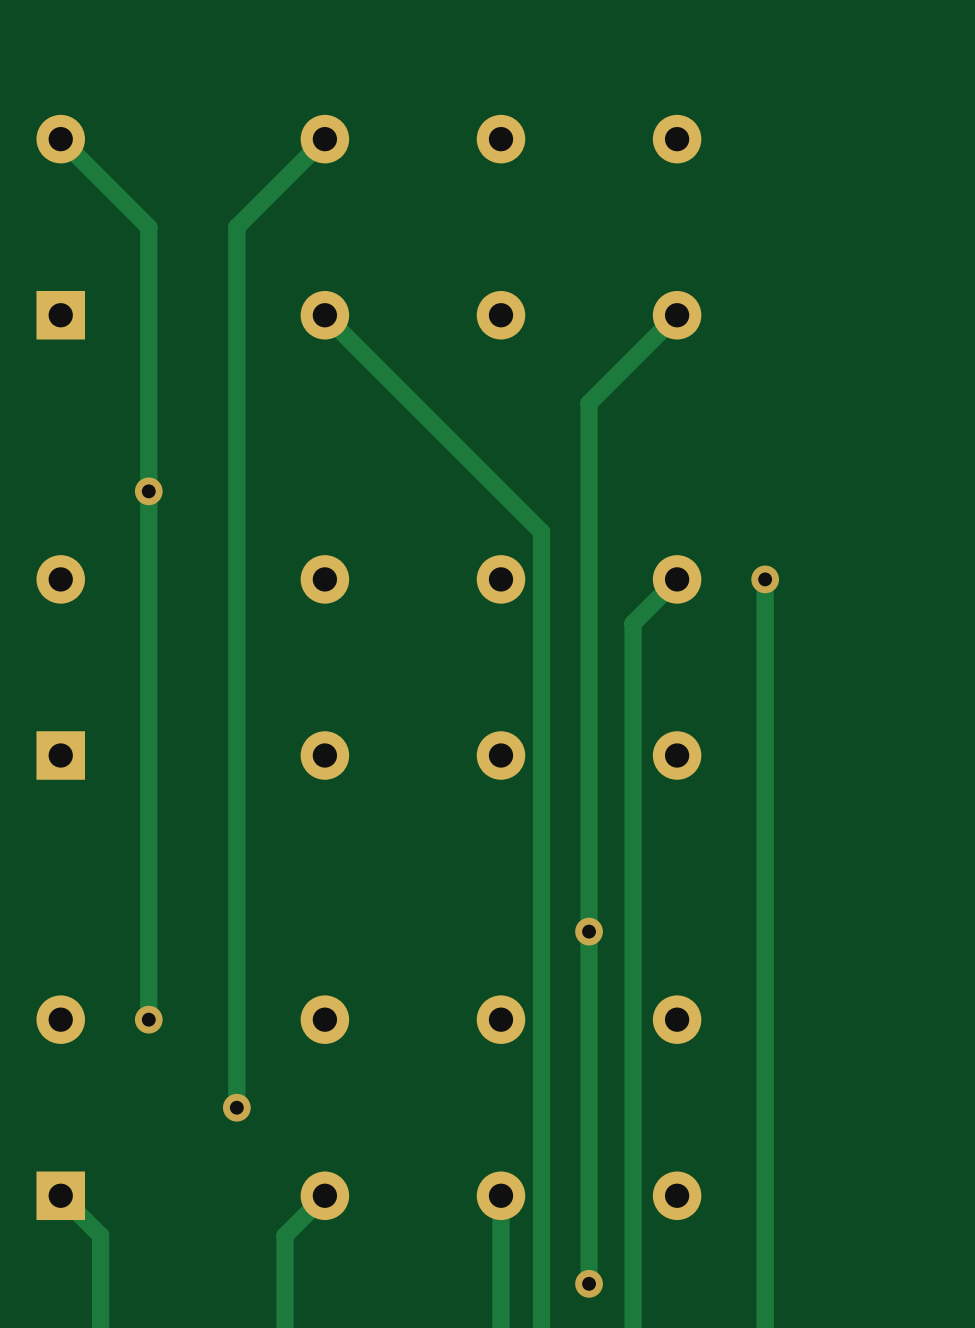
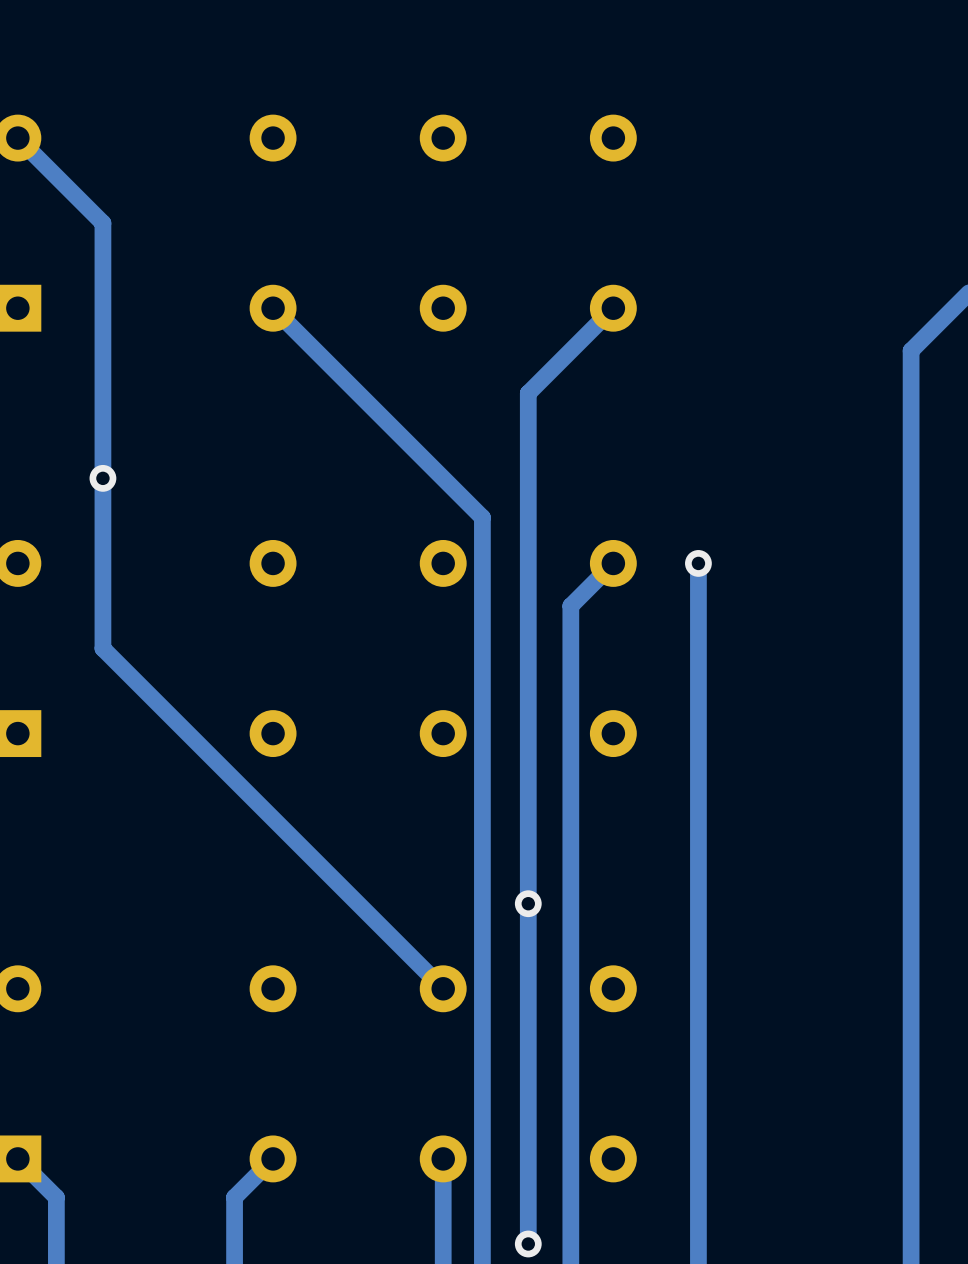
track: (324, 139) (236, 227) (236, 1107) -> none
track: (148, 667) (148, 1019) -> (102, 648) (443, 988)
via: (148, 1019) -> none
via: (236, 1107) -> none

